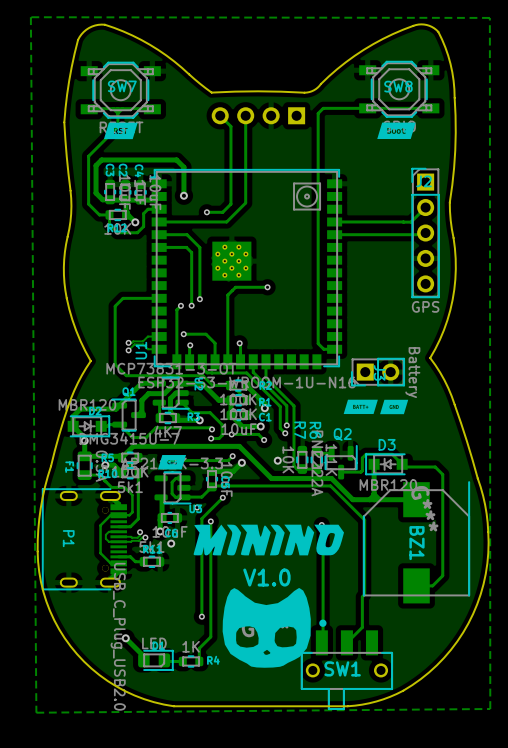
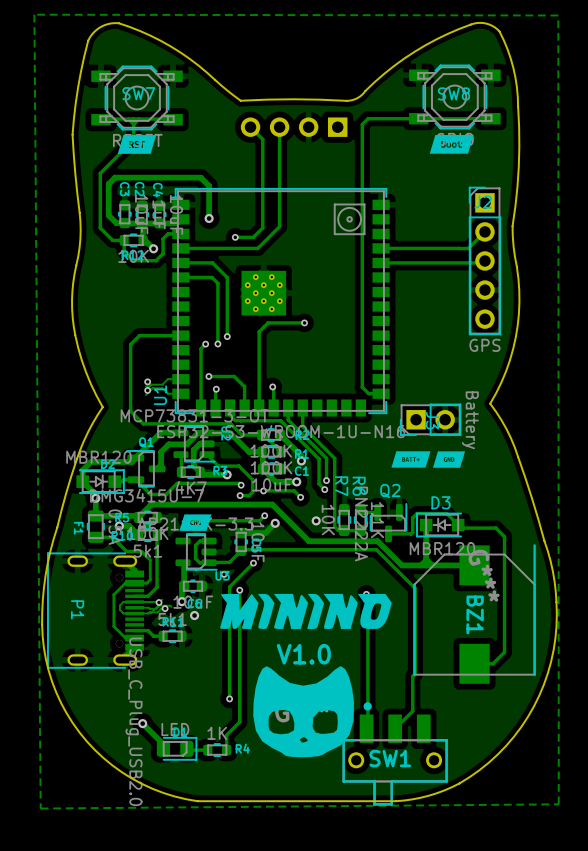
via: none -> (147, 381)
via: (128, 342) -> none
via: none -> (147, 390)
via: (128, 350) -> none
track: none -> (162, 599) (159, 602) (134, 602)
track: none -> (171, 606) (158, 605) (151, 612) (148, 612)

